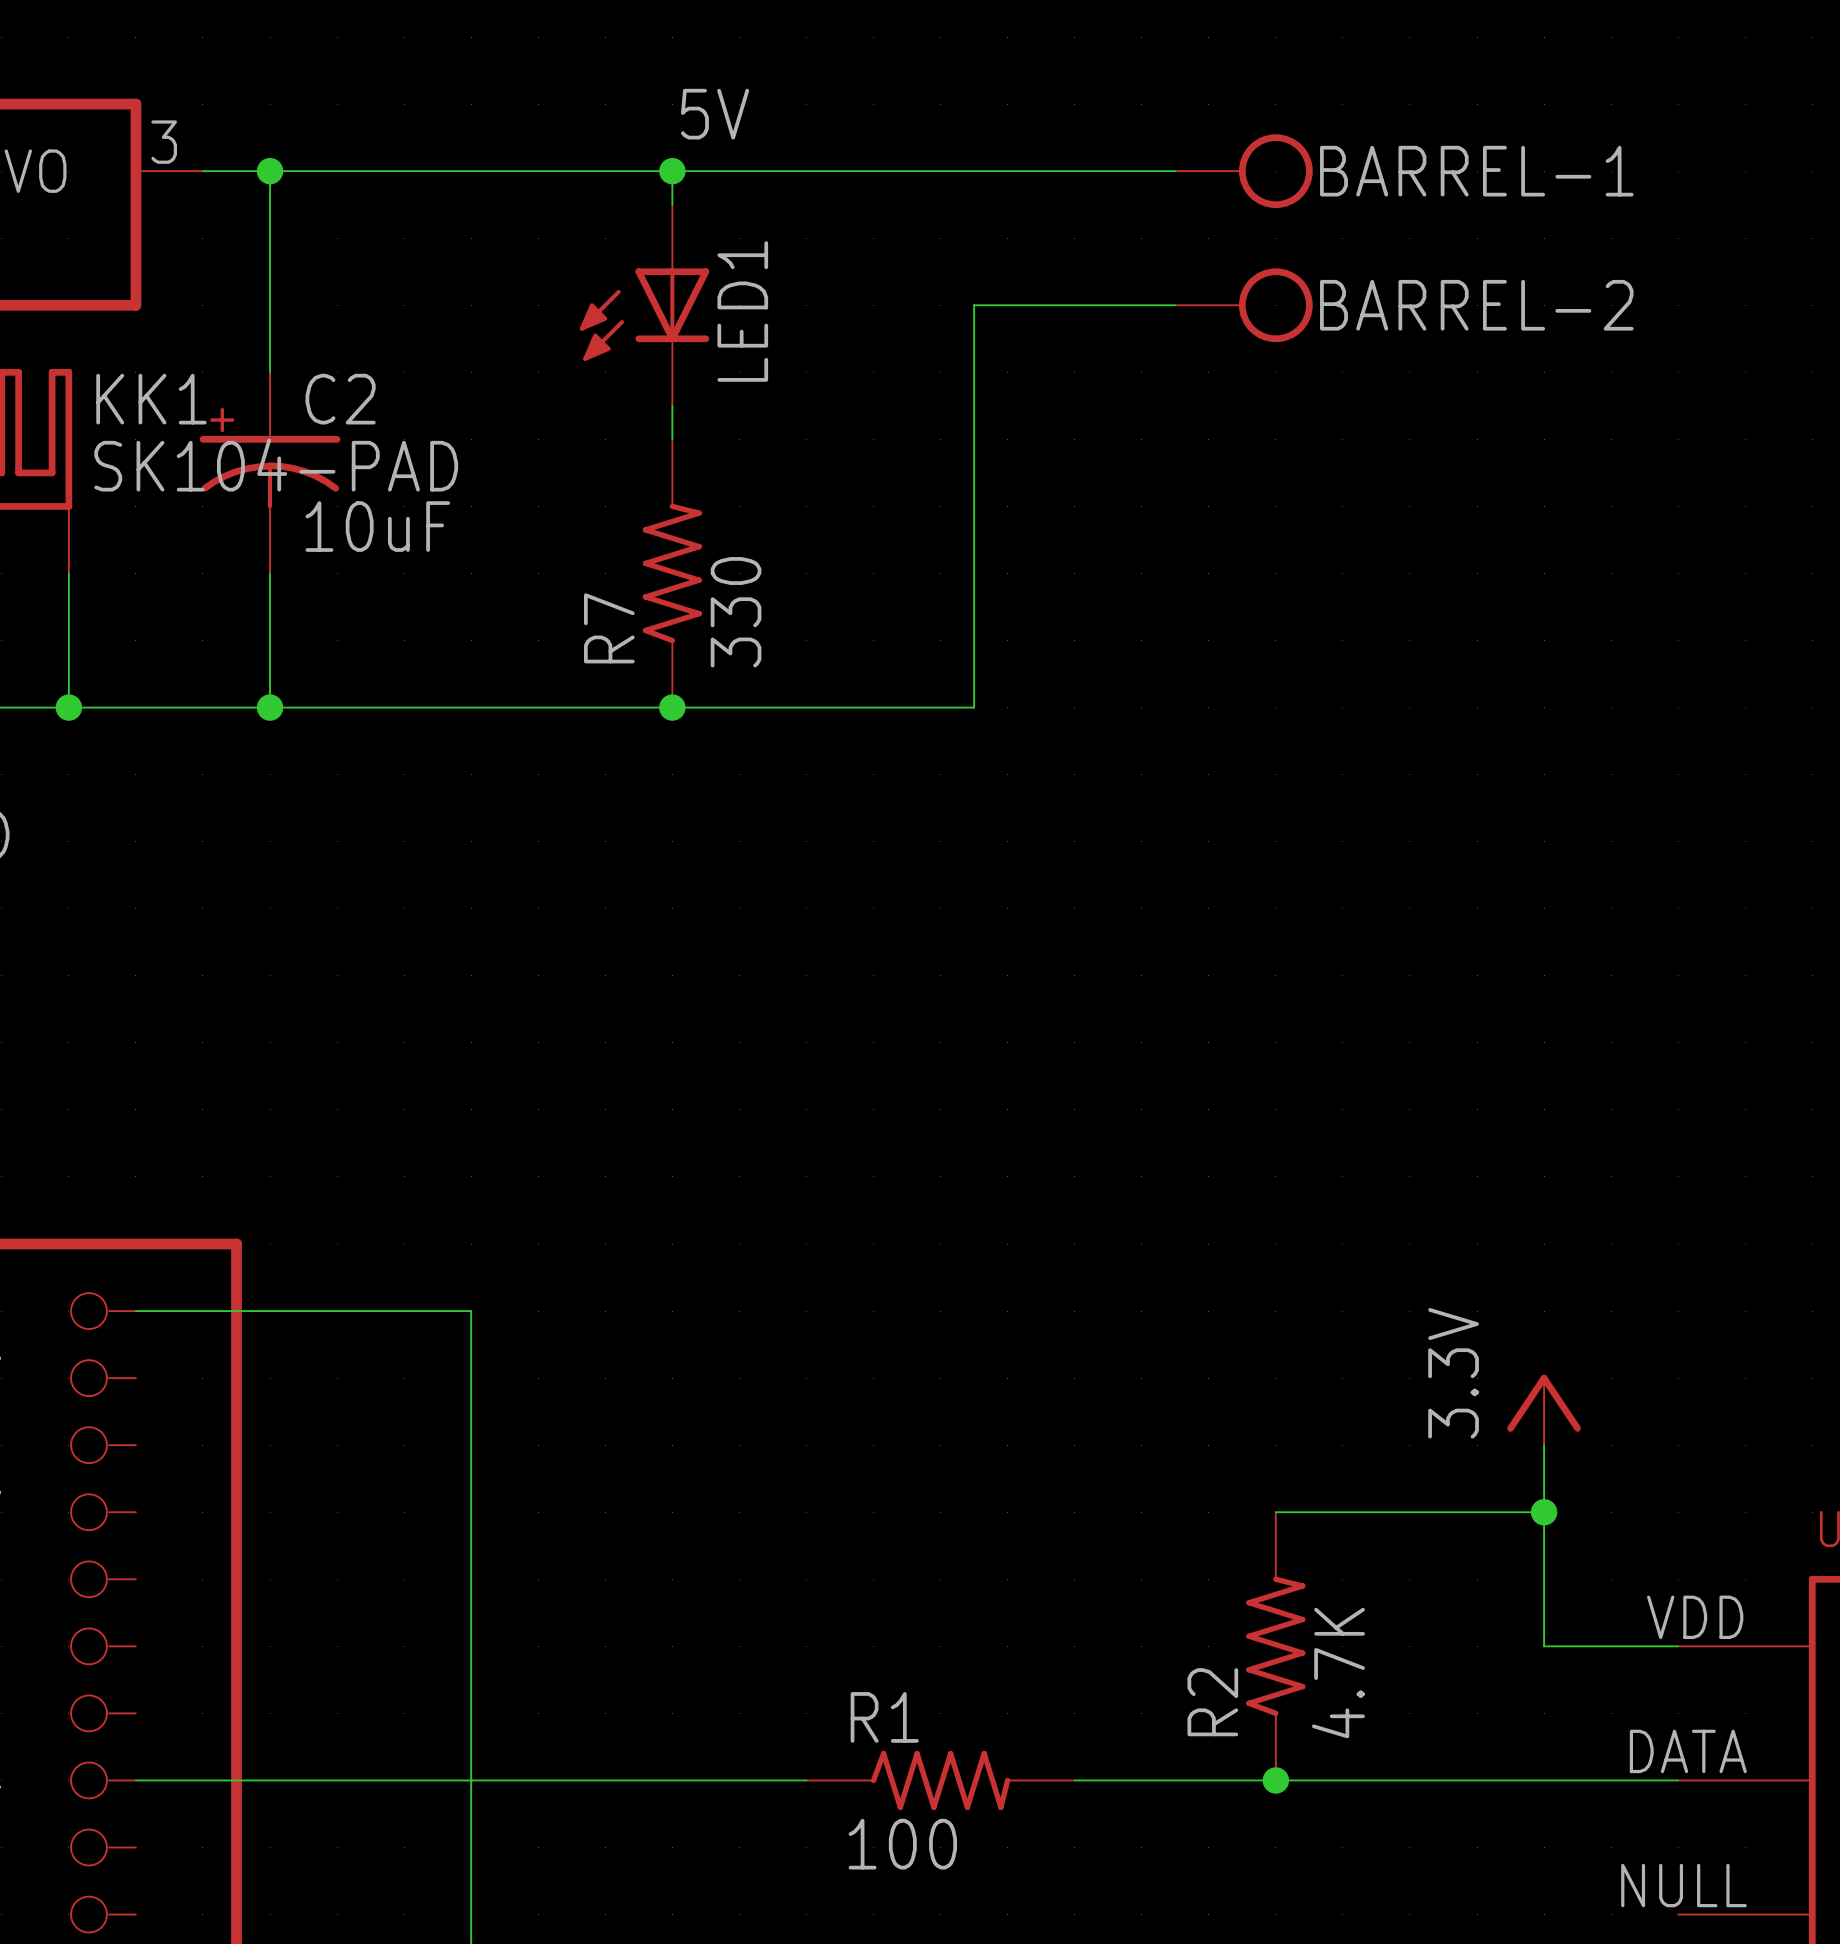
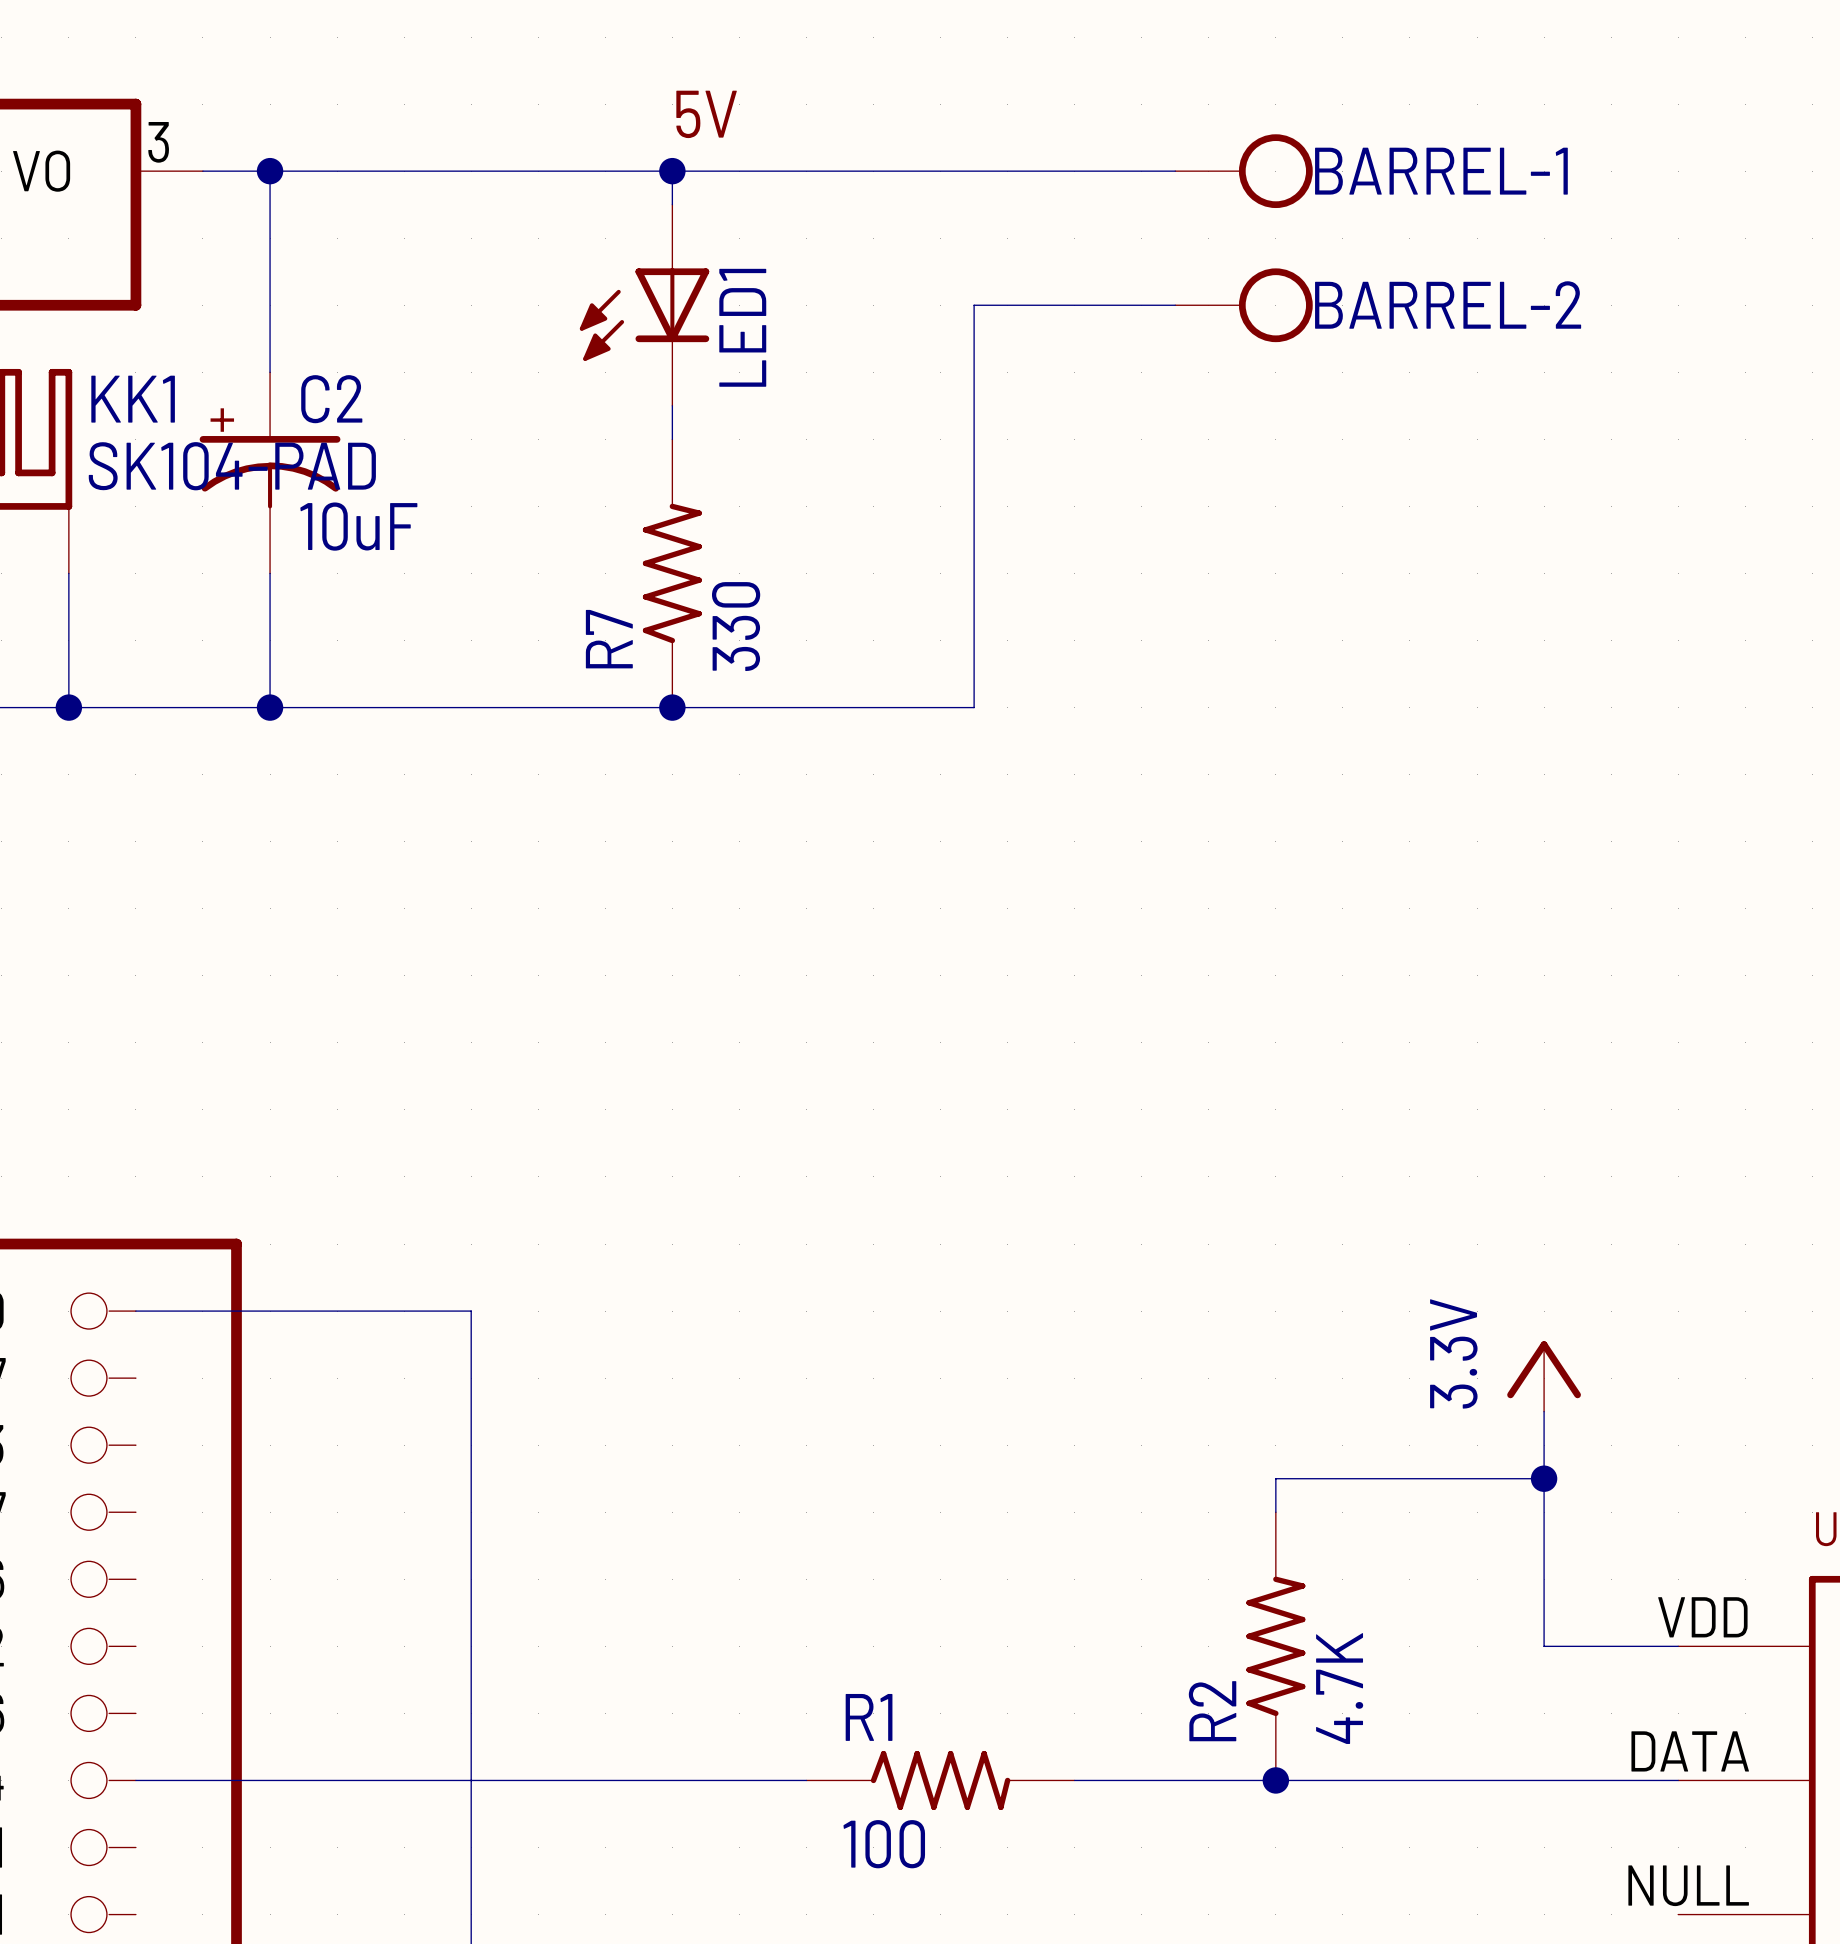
power symbol position: 3.3V (1544, 1409) -> 3.3V (1544, 1376)
wire: (1275, 1512) (1544, 1512) -> (1275, 1512) (1275, 1478) (1544, 1478)
junction position: (1544, 1512) -> (1544, 1478)

